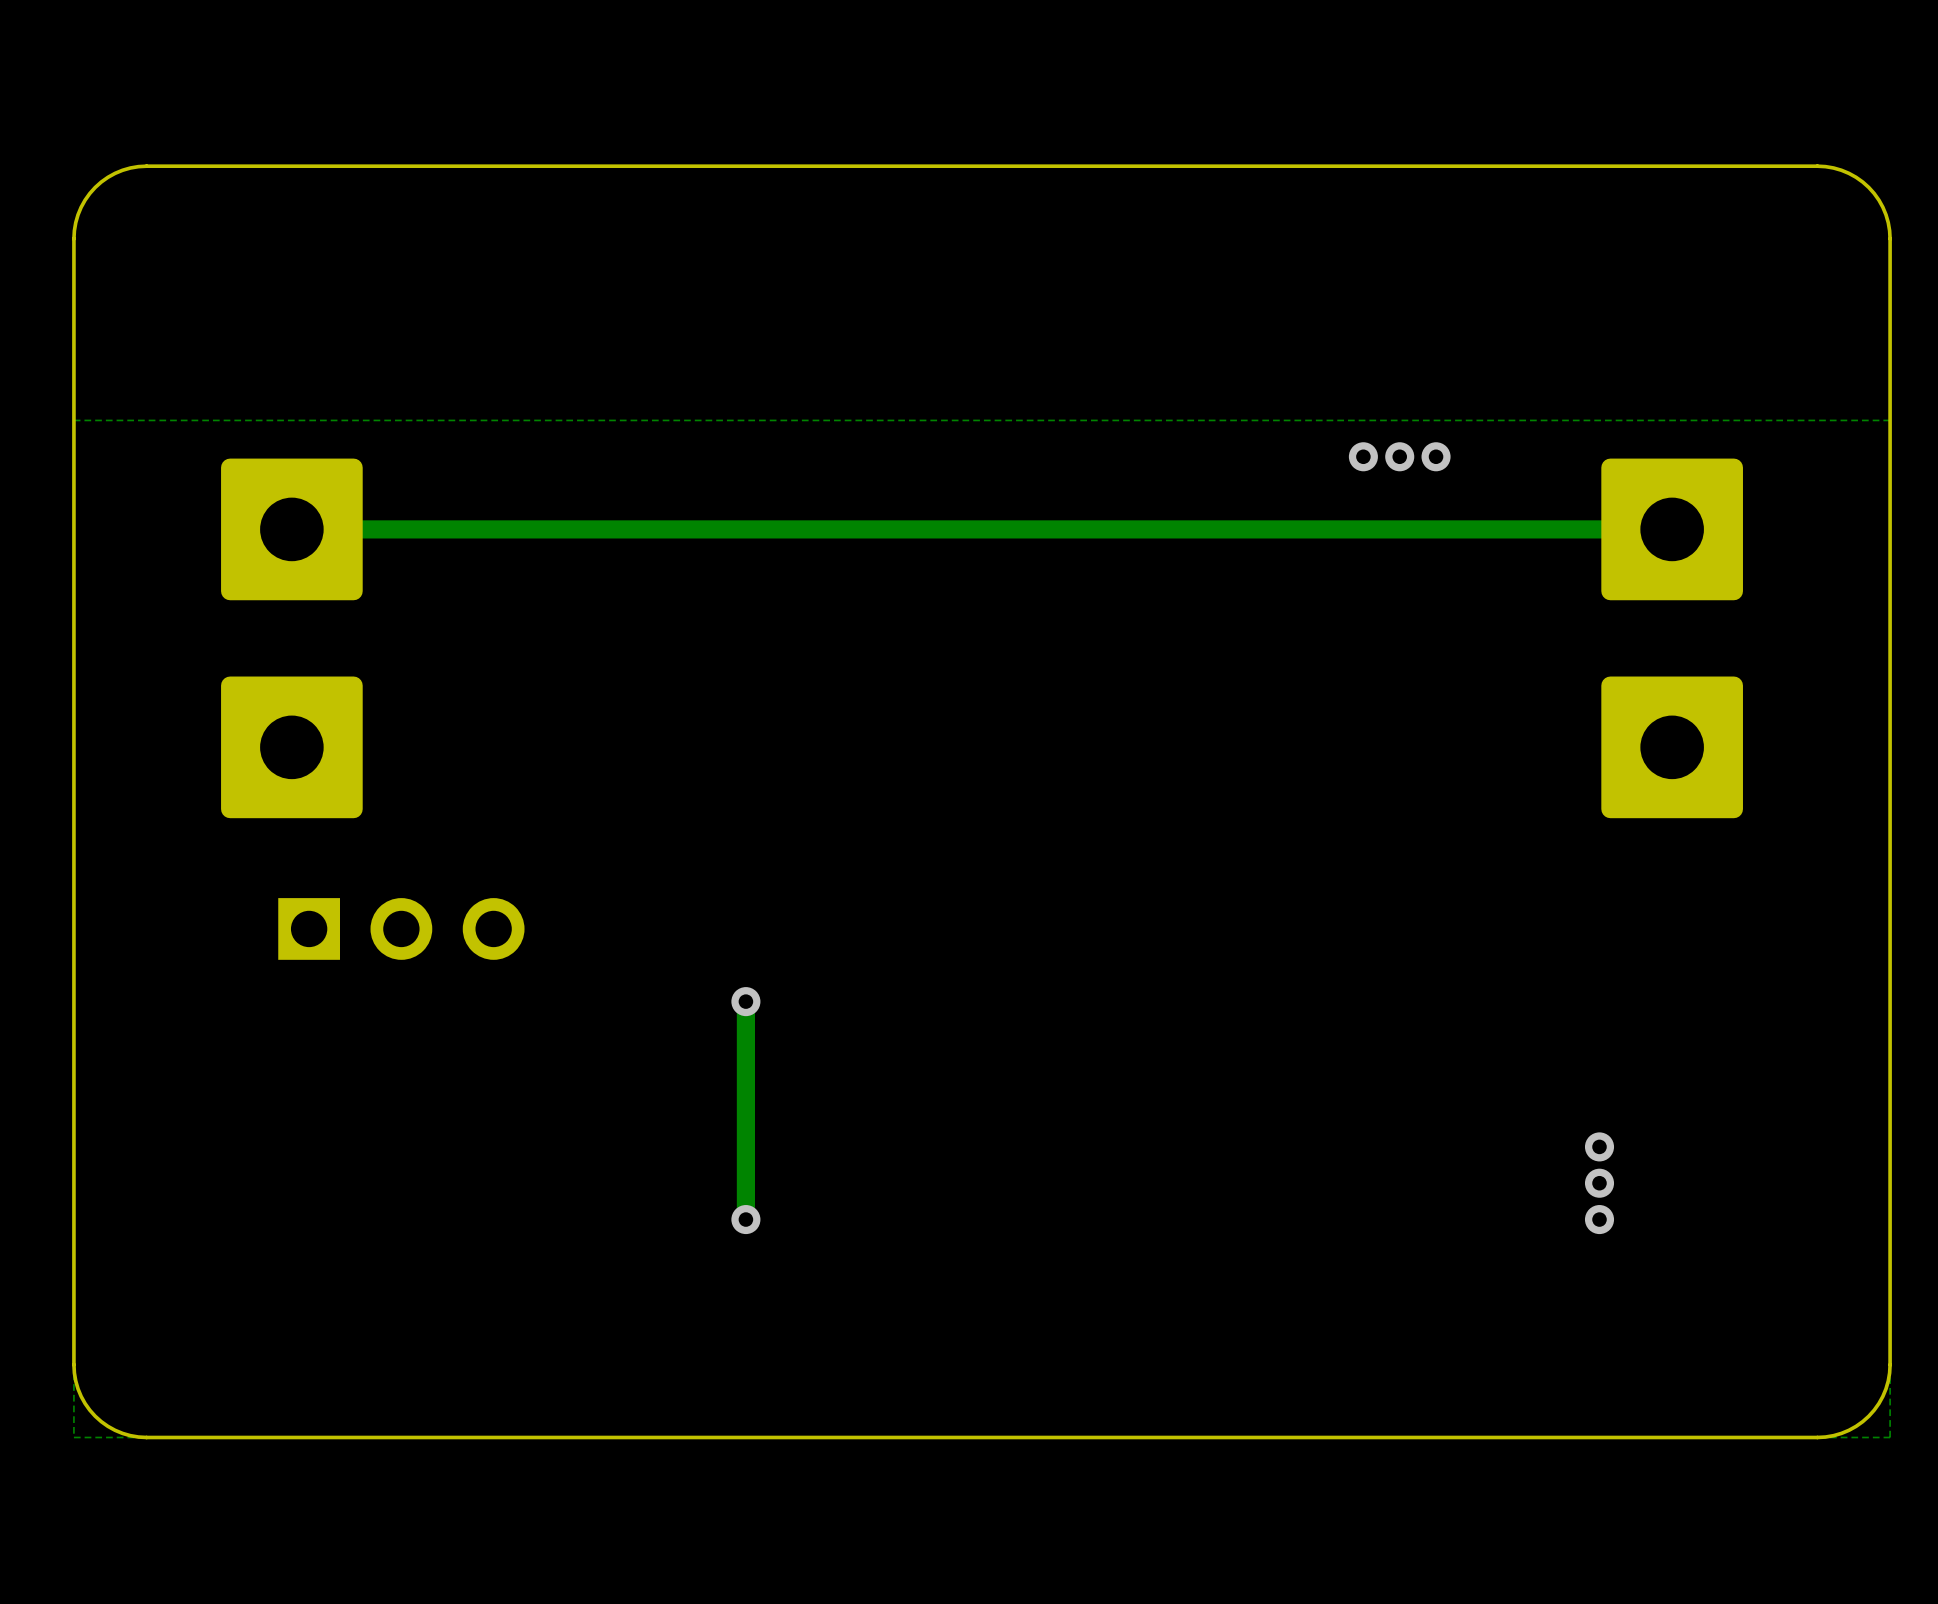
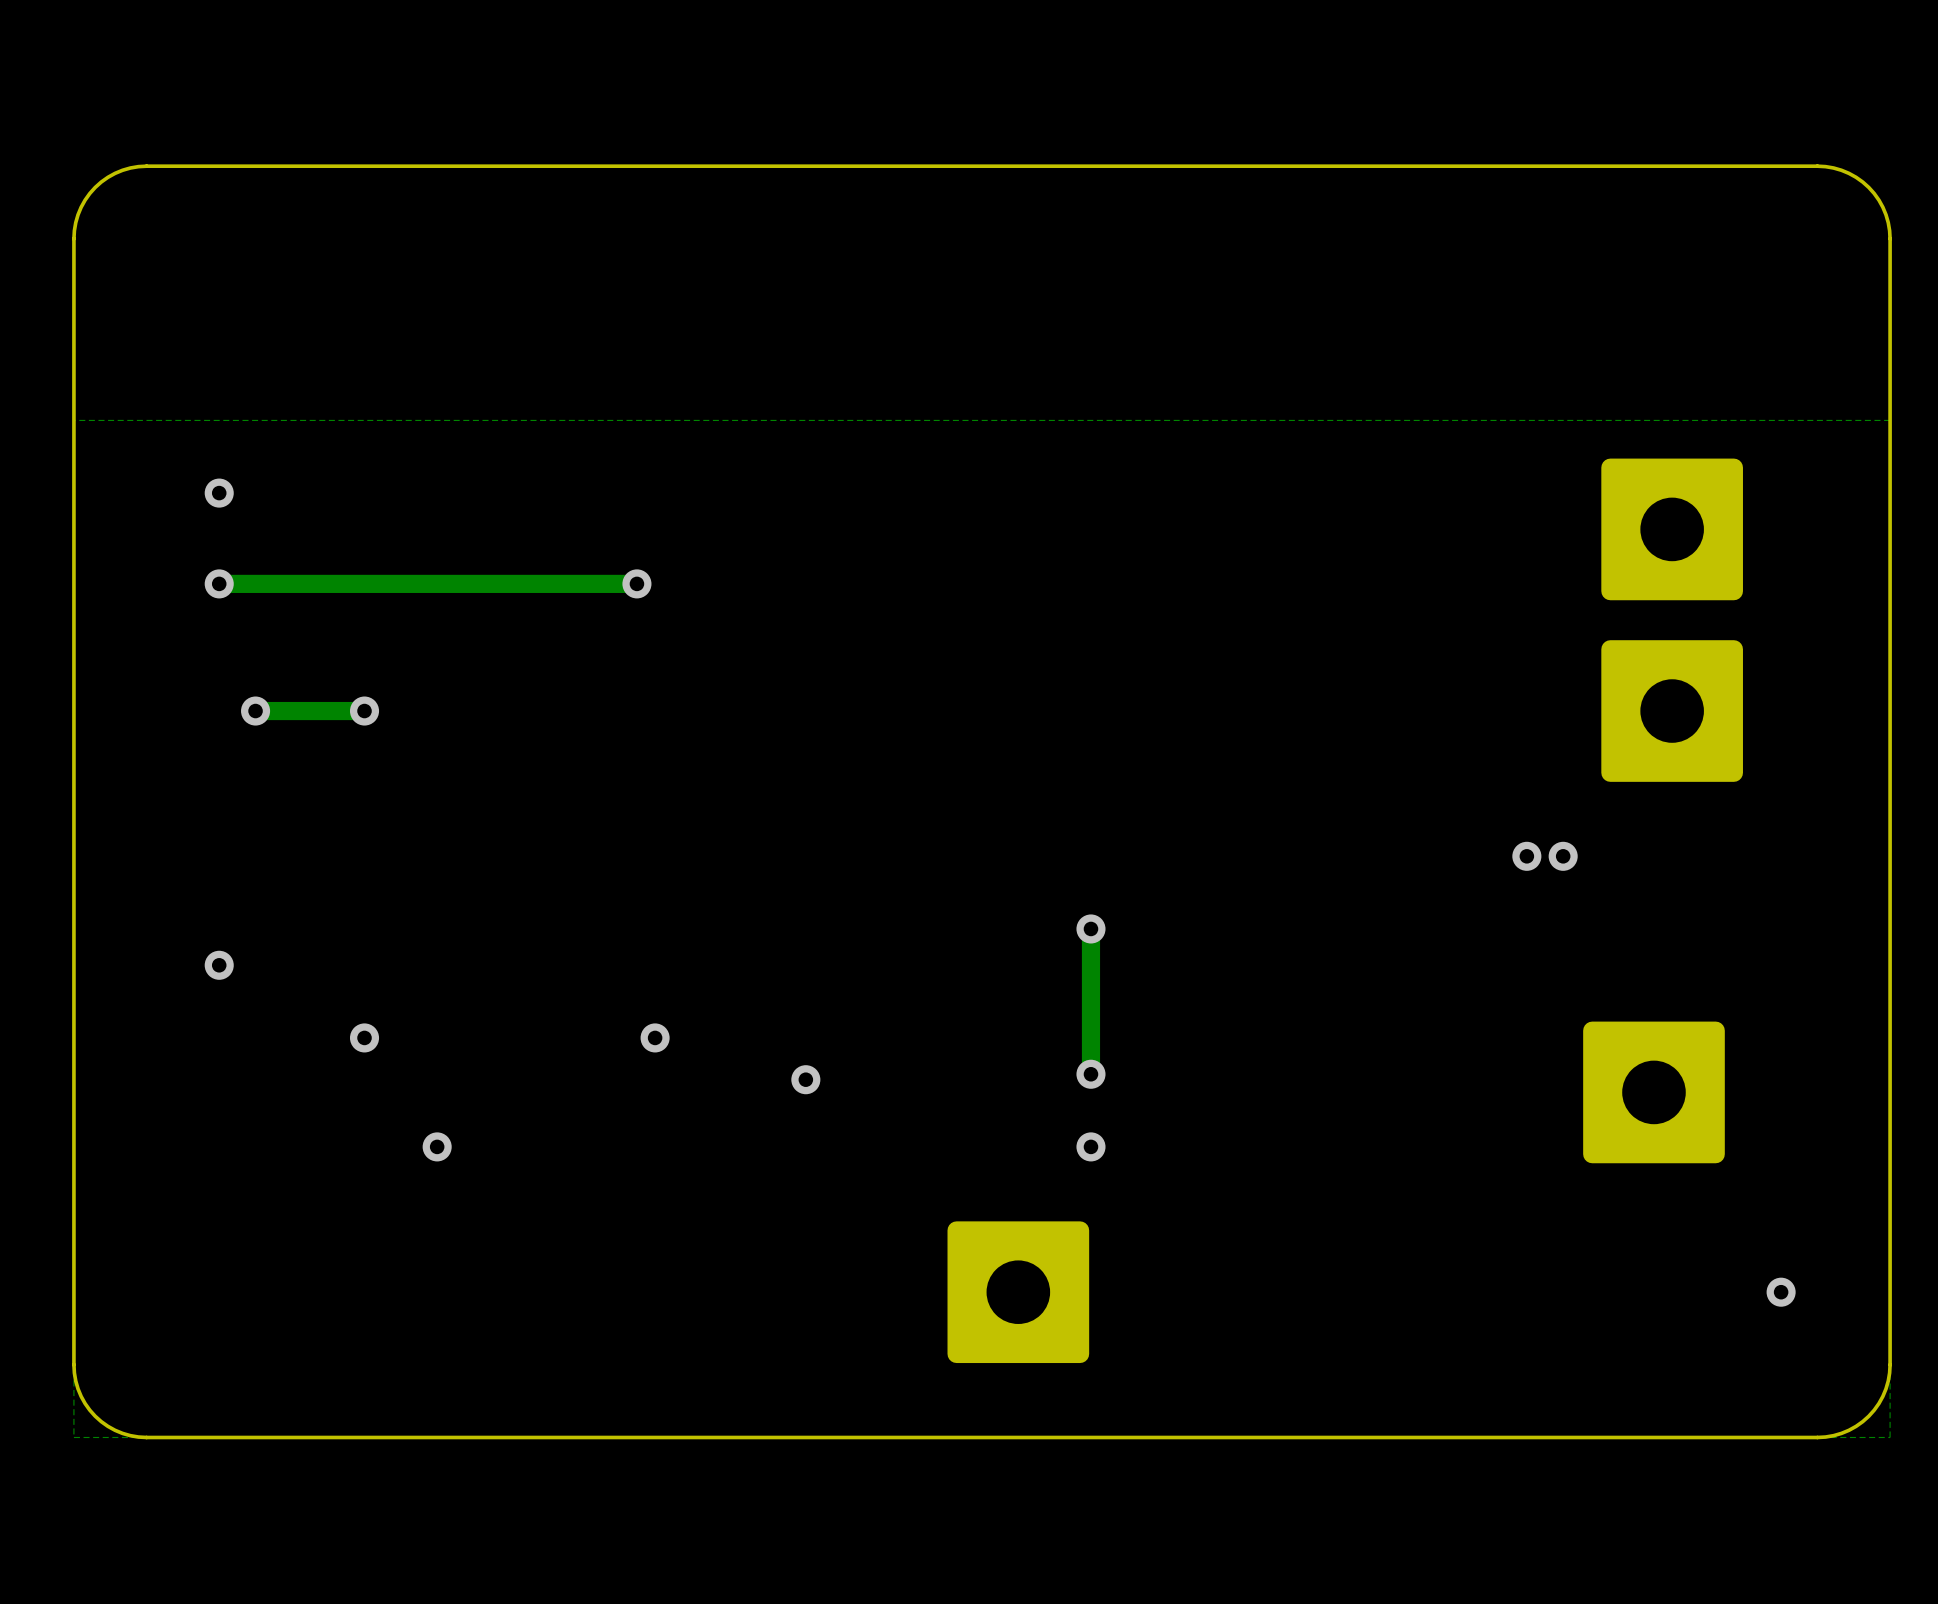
via: (1363, 456) -> none
via: (1399, 456) -> none
via: (1436, 456) -> none
via: none -> (219, 493)
part: (291, 529) -> none
track: (1672, 529) (291, 529) -> none
via: none -> (219, 583)
track: none -> (636, 583) (219, 583)
via: none -> (636, 583)
via: none -> (255, 711)
track: none -> (364, 711) (255, 711)
via: none -> (364, 711)
part: (291, 747) -> none
part position: (1672, 747) -> (1672, 711)
via: none -> (1526, 856)
via: none -> (1563, 856)
part: (401, 928) -> none
track: none -> (1090, 928) (1090, 1074)
via: none -> (1090, 928)
via: none -> (219, 965)
track: (745, 1001) (745, 1219) -> none
via: (745, 1001) -> none
via: none -> (364, 1037)
via: none -> (655, 1037)
via: none -> (1090, 1074)
via: none -> (805, 1079)
part: none -> (1653, 1092)
via: none -> (437, 1146)
via: none -> (1090, 1146)
via: (1599, 1146) -> none
via: (1599, 1183) -> none
via: (745, 1219) -> none
via: (1599, 1219) -> none
part: none -> (1018, 1292)
via: none -> (1781, 1292)

